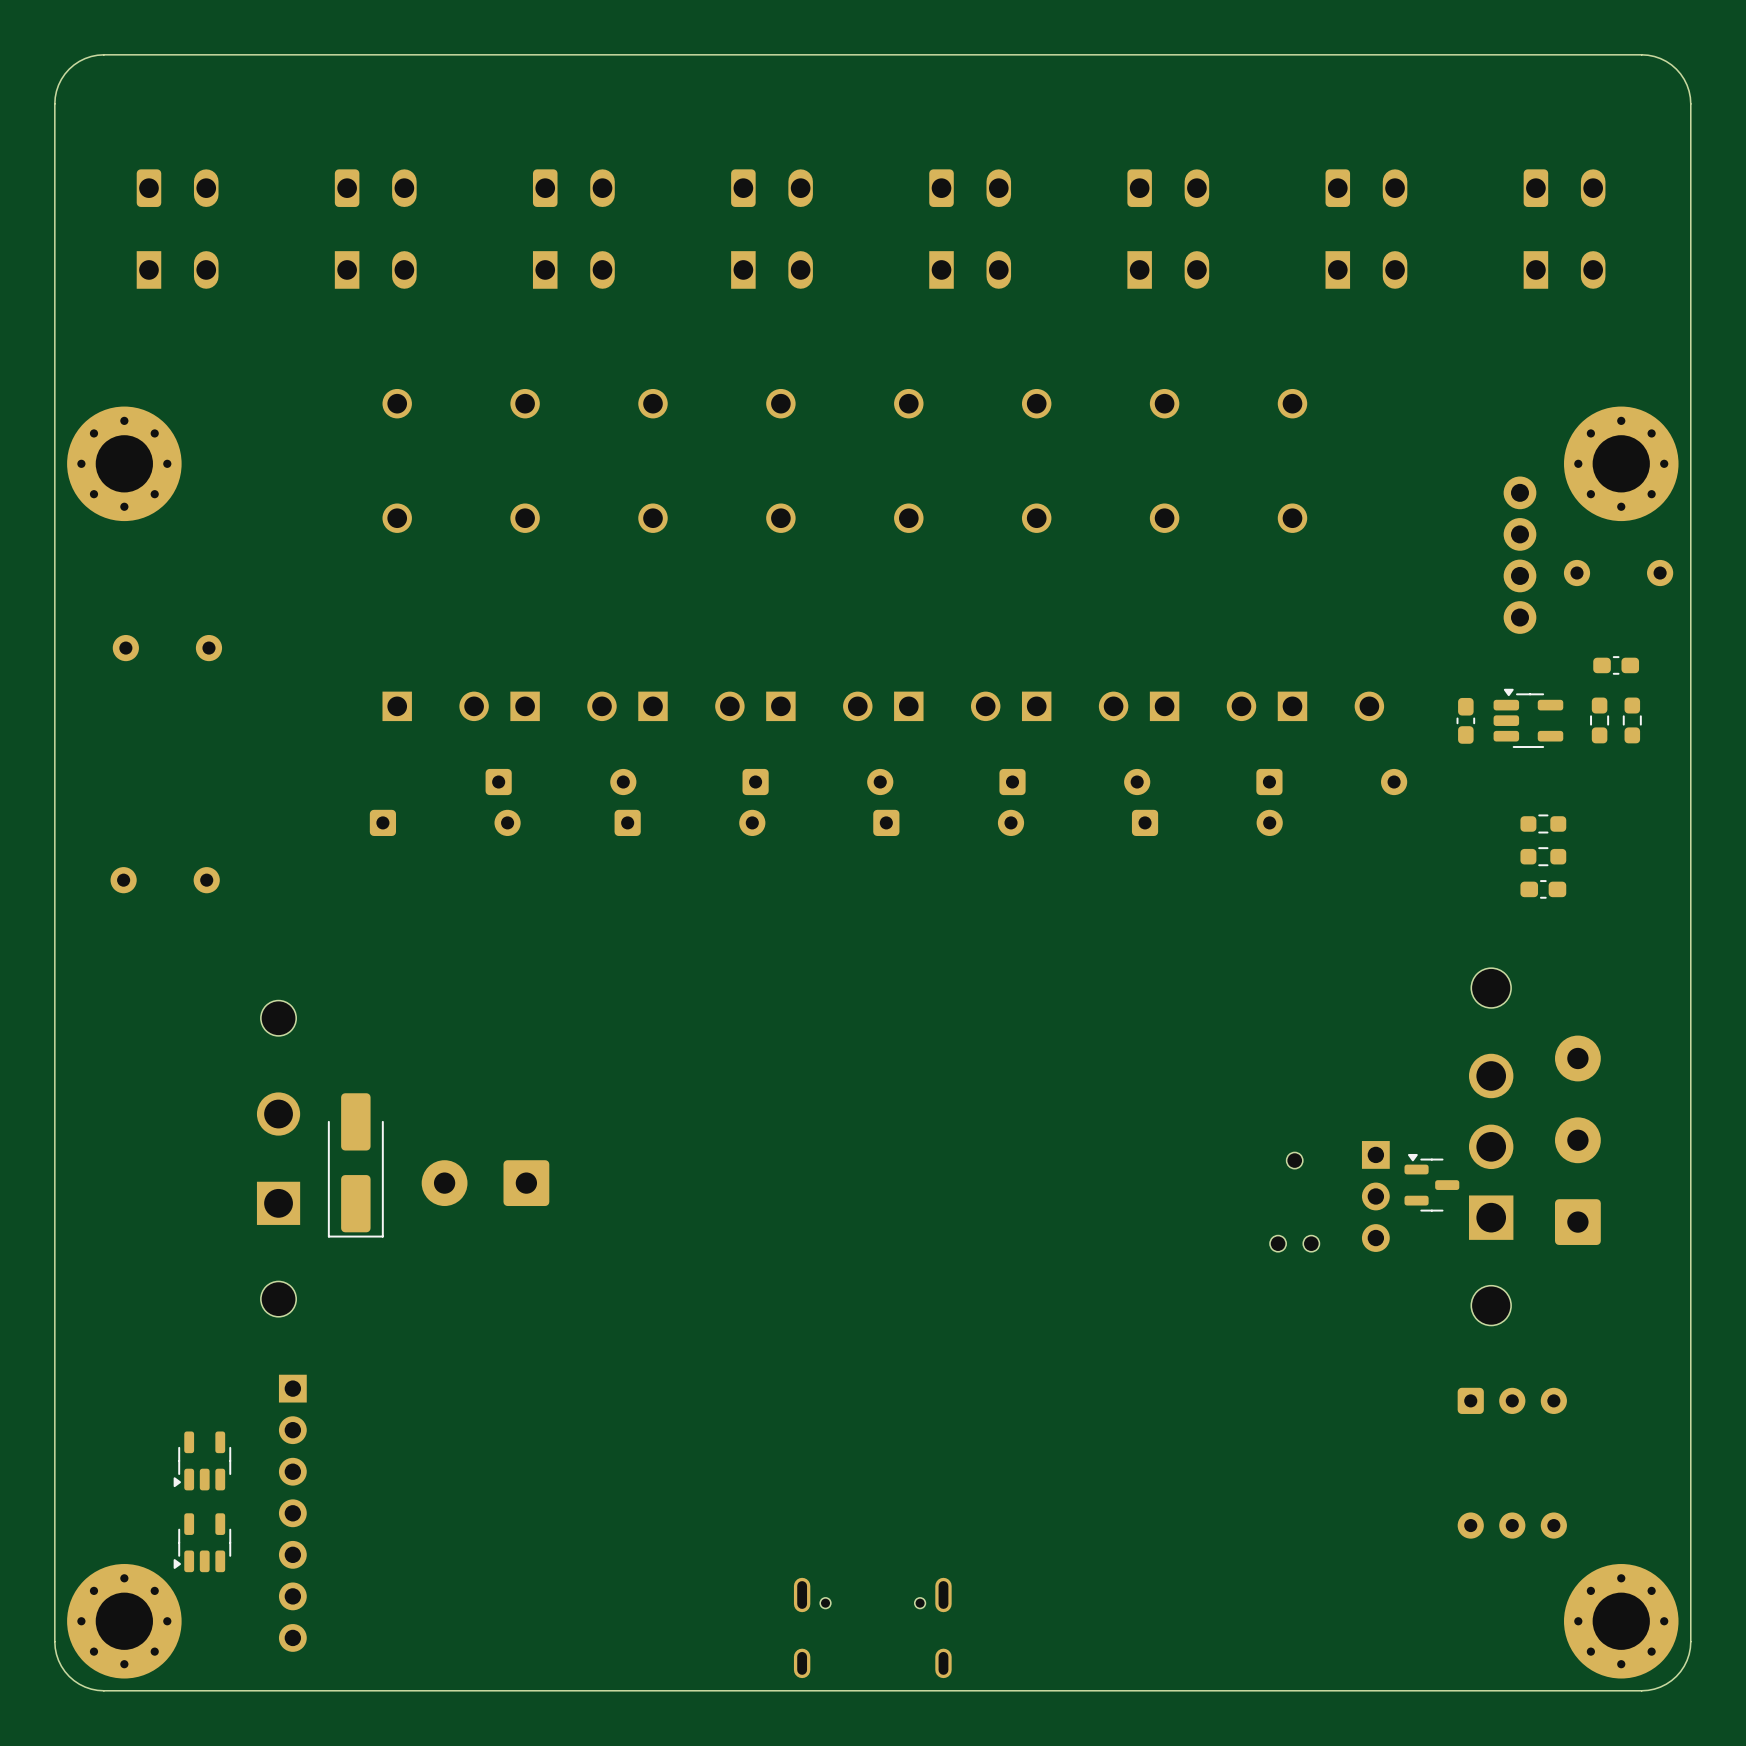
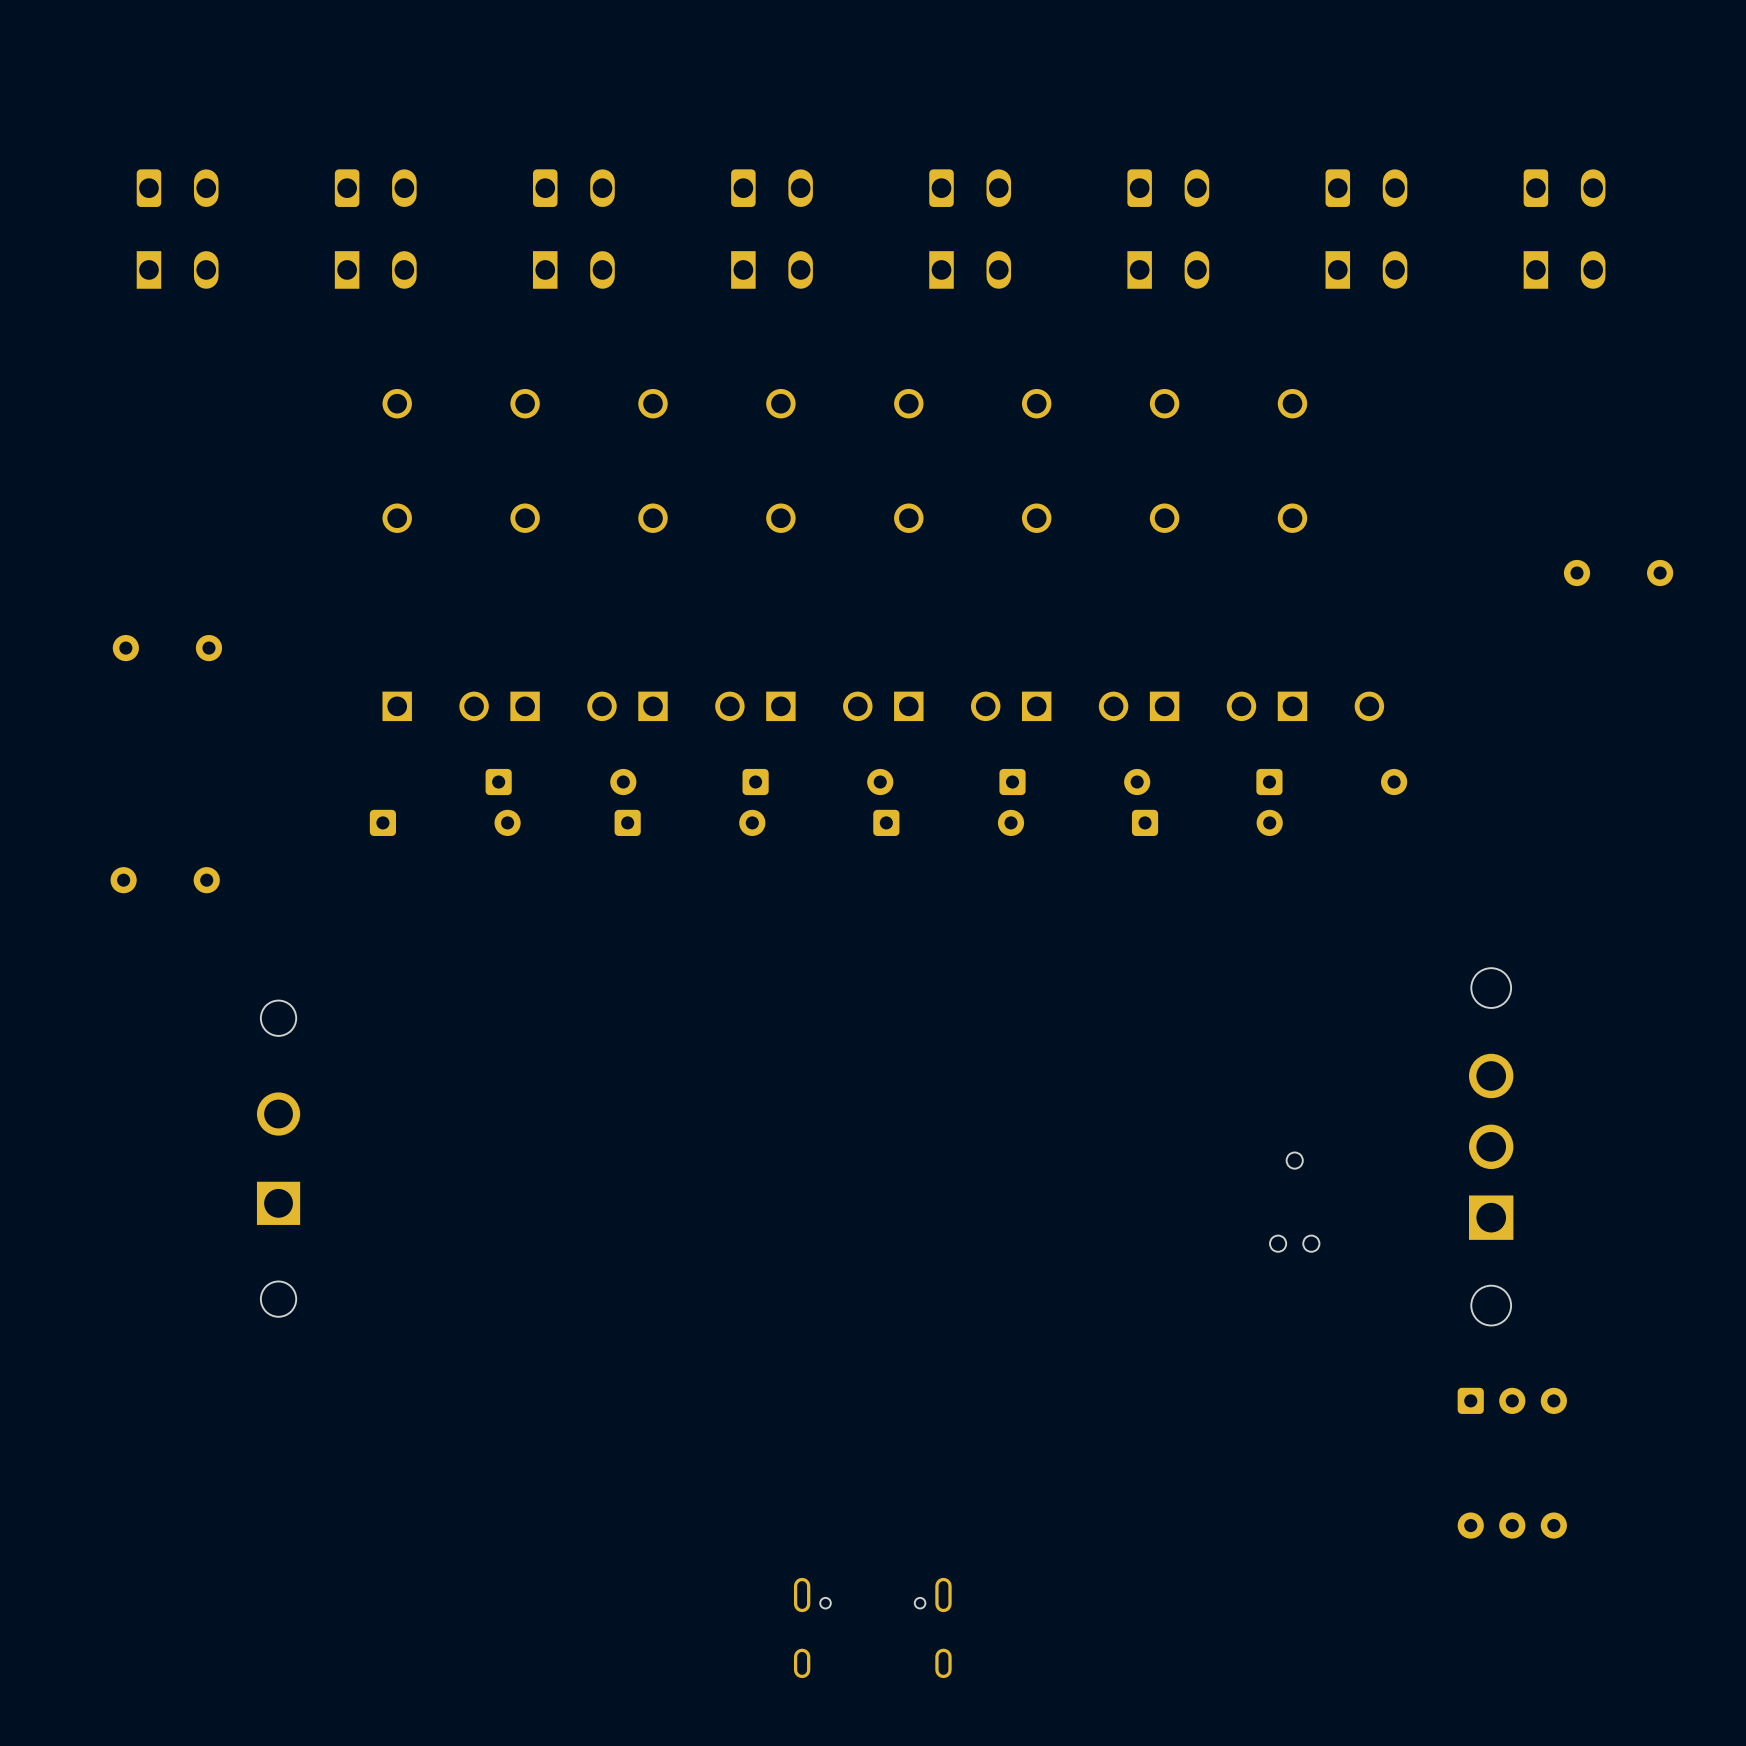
board edge: (1641, 54) (103, 54) (85, 58) (69, 69) (58, 85) (54, 103) (54, 1641) (58, 1660) (69, 1676) (85, 1687) (103, 1690) (1641, 1690) (1660, 1687) (1676, 1676) (1687, 1660) (1690, 1641) (1690, 103) (1687, 85) (1676, 69) (1660, 58) (1641, 54) -> none
part: (124, 463) -> none
part: (1621, 463) -> none
part: (1519, 555) -> none
part: (1616, 665) -> none
part: (1528, 718) -> none
part: (1465, 720) -> none
part: (1599, 720) -> none
part: (1632, 720) -> none
part: (1543, 823) -> none
part: (1543, 856) -> none
part: (1543, 889) -> none
part: (1577, 1140) -> none
part: (355, 1165) -> none
part: (1431, 1182) -> none
part: (485, 1183) -> none
part: (1375, 1196) -> none
part: (202, 1460) -> none
part: (292, 1513) -> none
part: (202, 1542) -> none
part: (124, 1621) -> none
part: (1621, 1621) -> none

